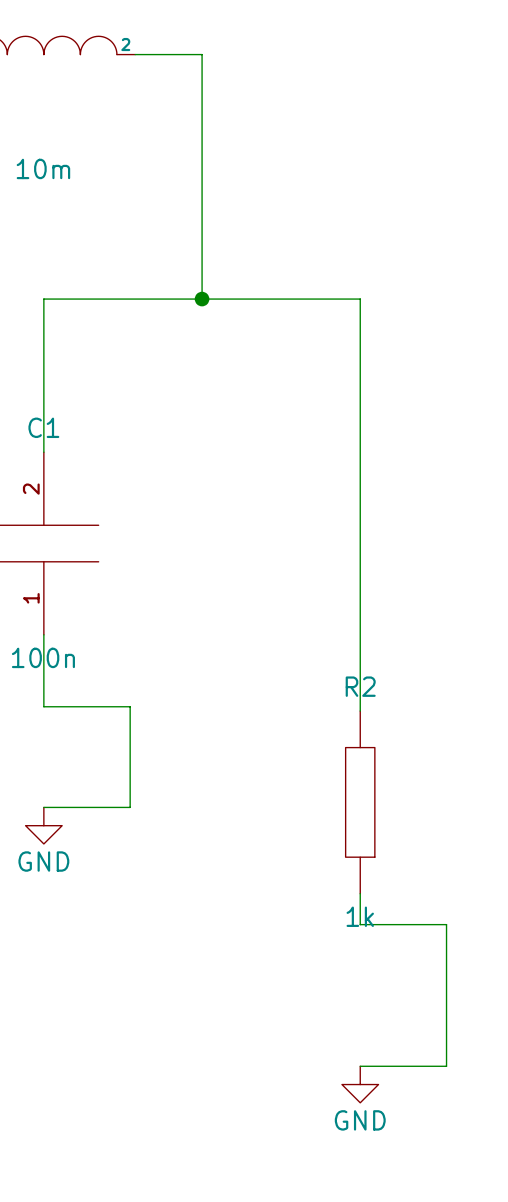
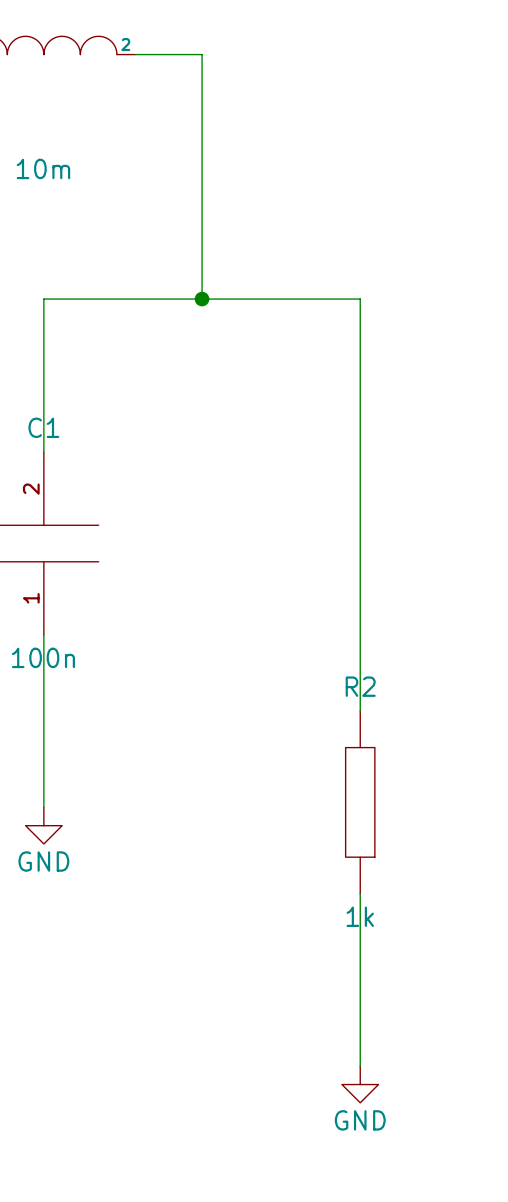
wire: (43, 706) (130, 706) (130, 807) (43, 807) -> (43, 706) (43, 807)
wire: (360, 924) (446, 924) (446, 1066) (360, 1066) -> (360, 924) (360, 1066)

